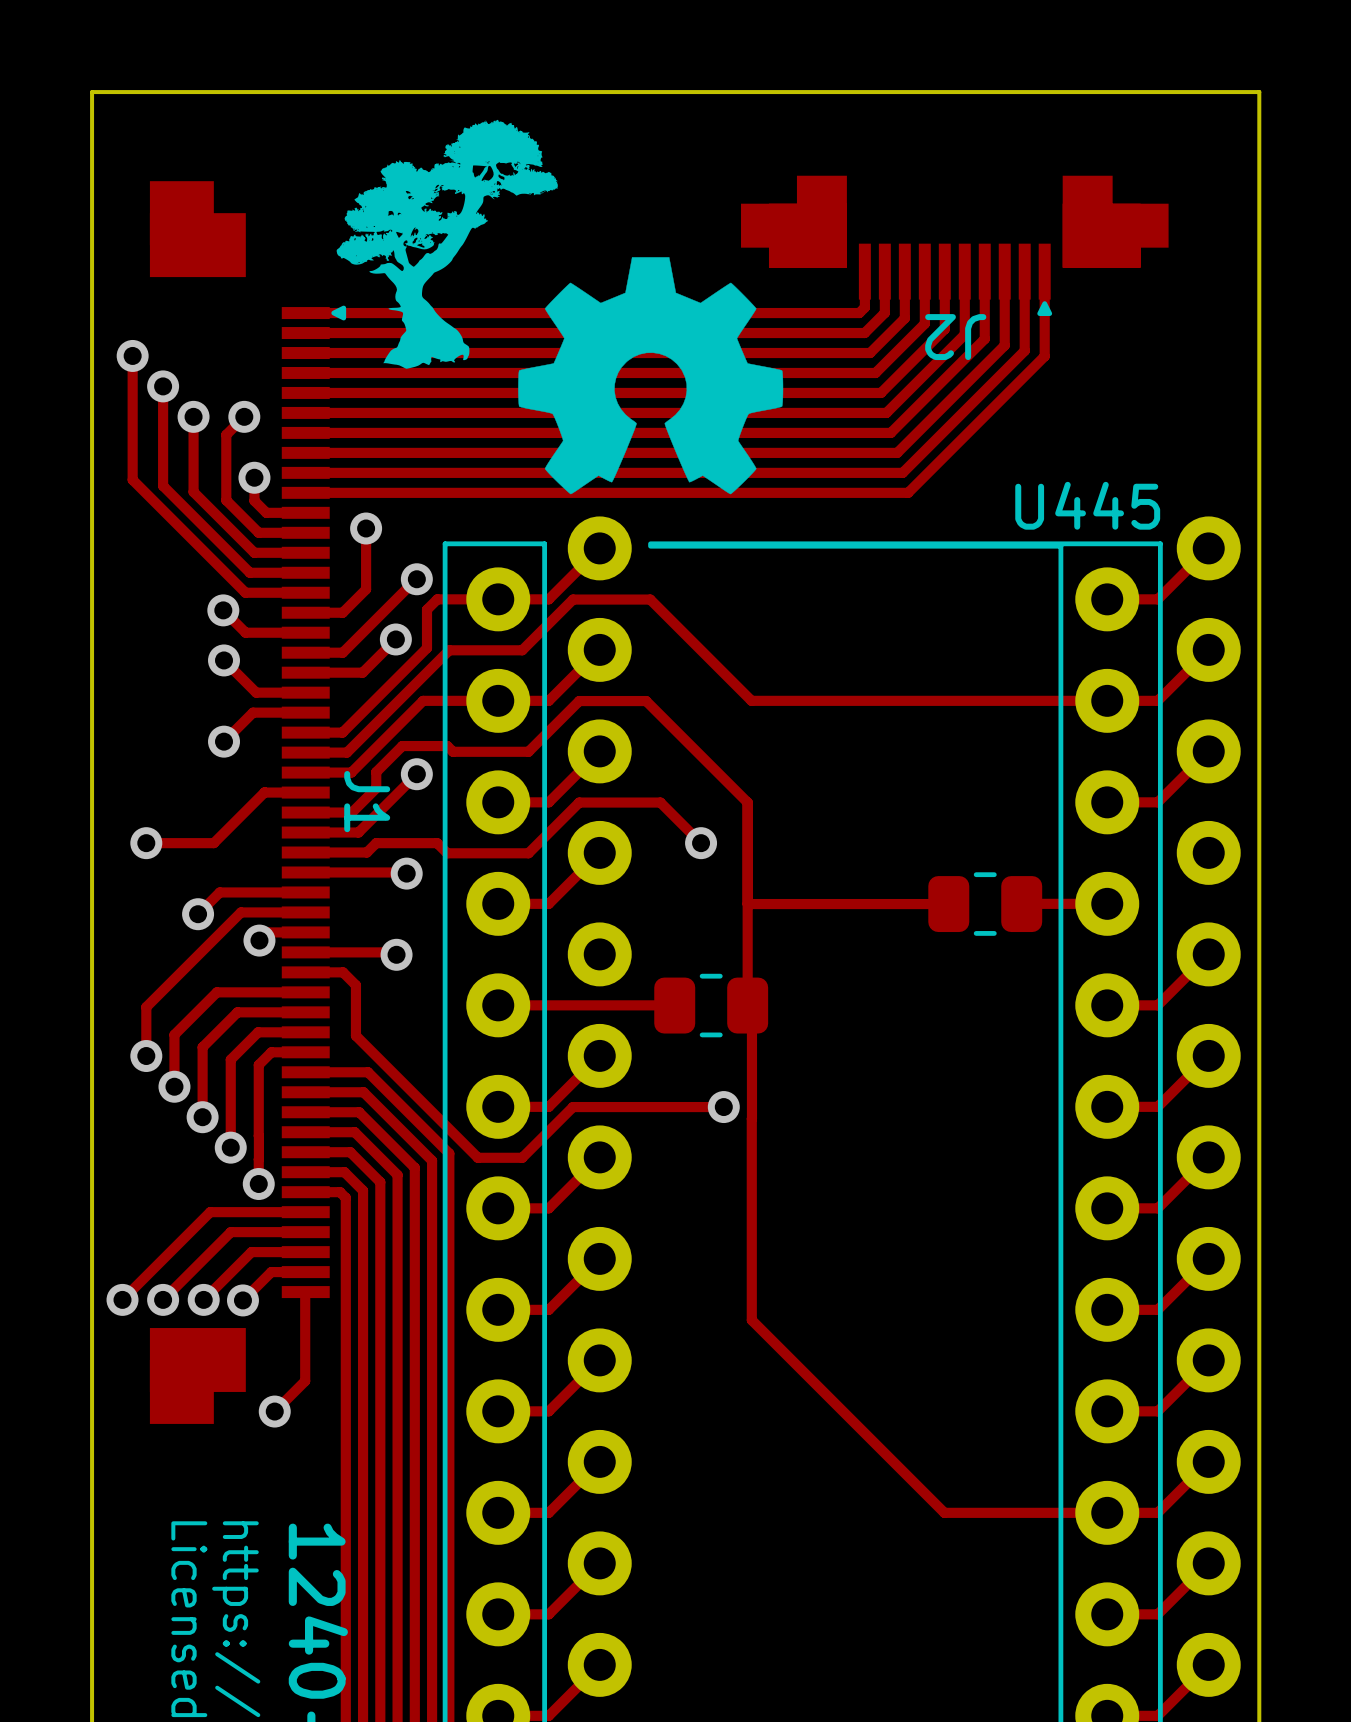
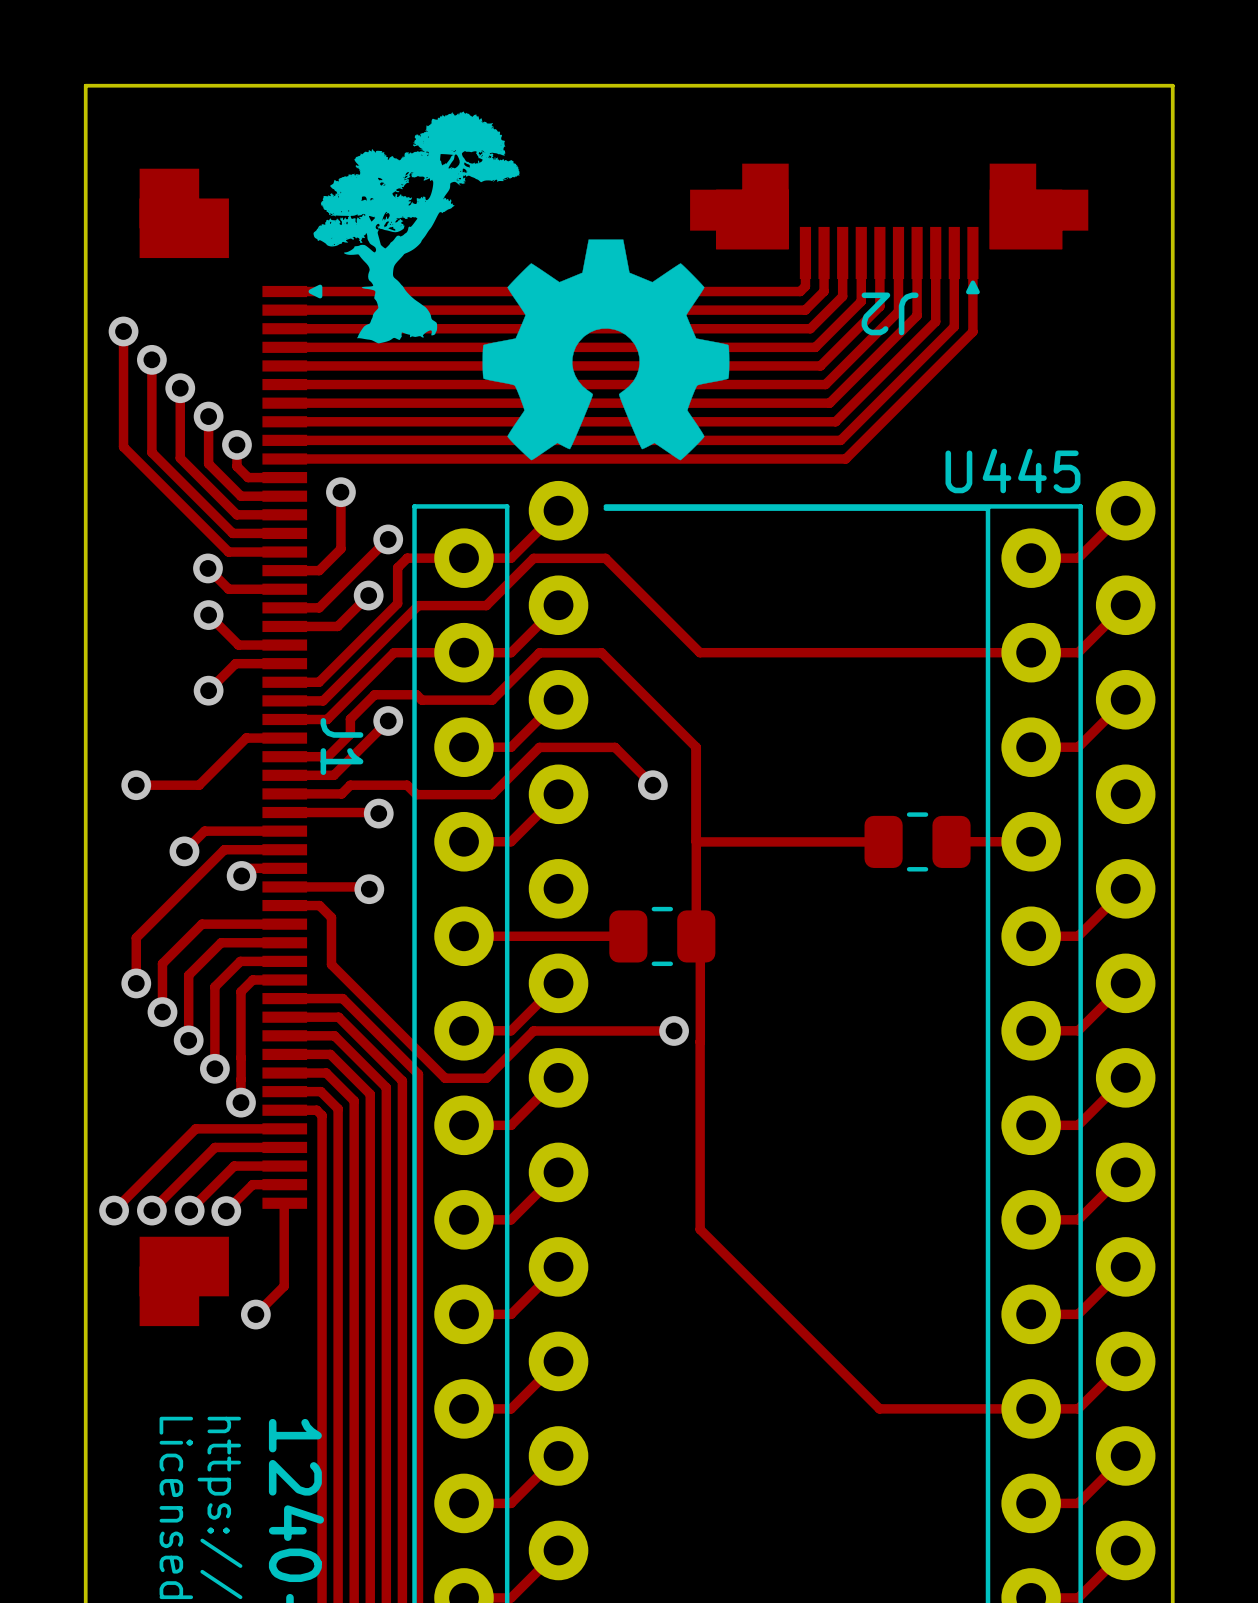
track: (244, 416) (226, 434) (226, 500) -> (208, 416) (208, 463) (210, 465)
via position: (244, 416) -> (208, 416)

